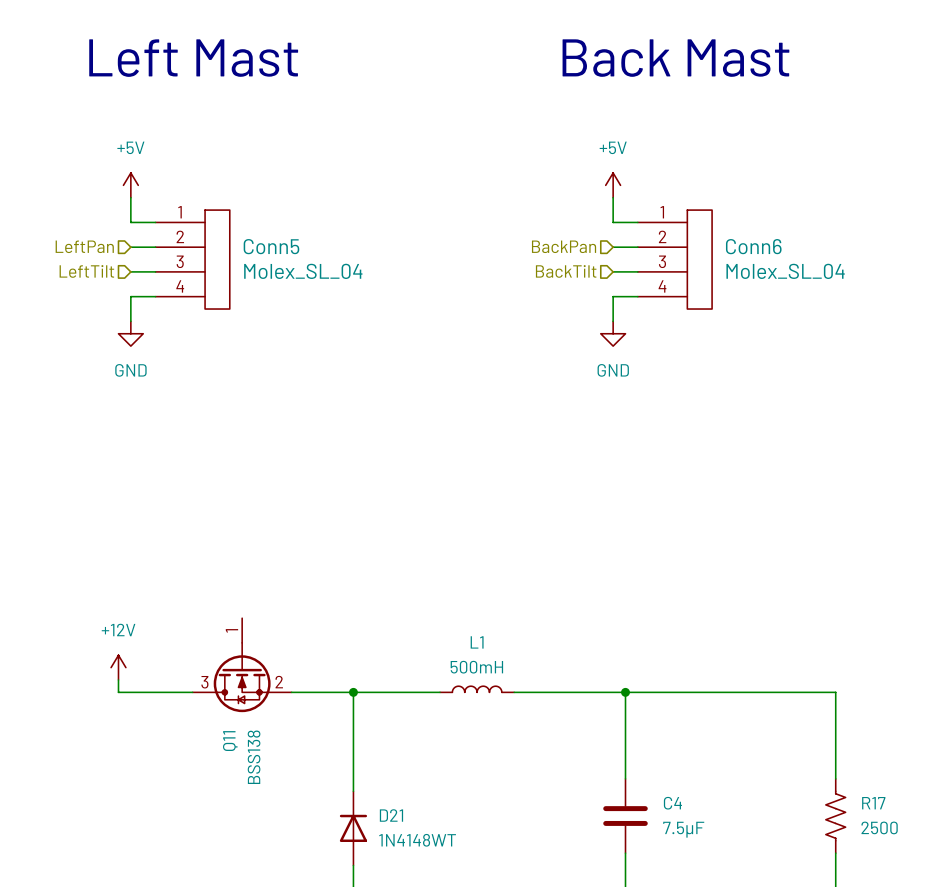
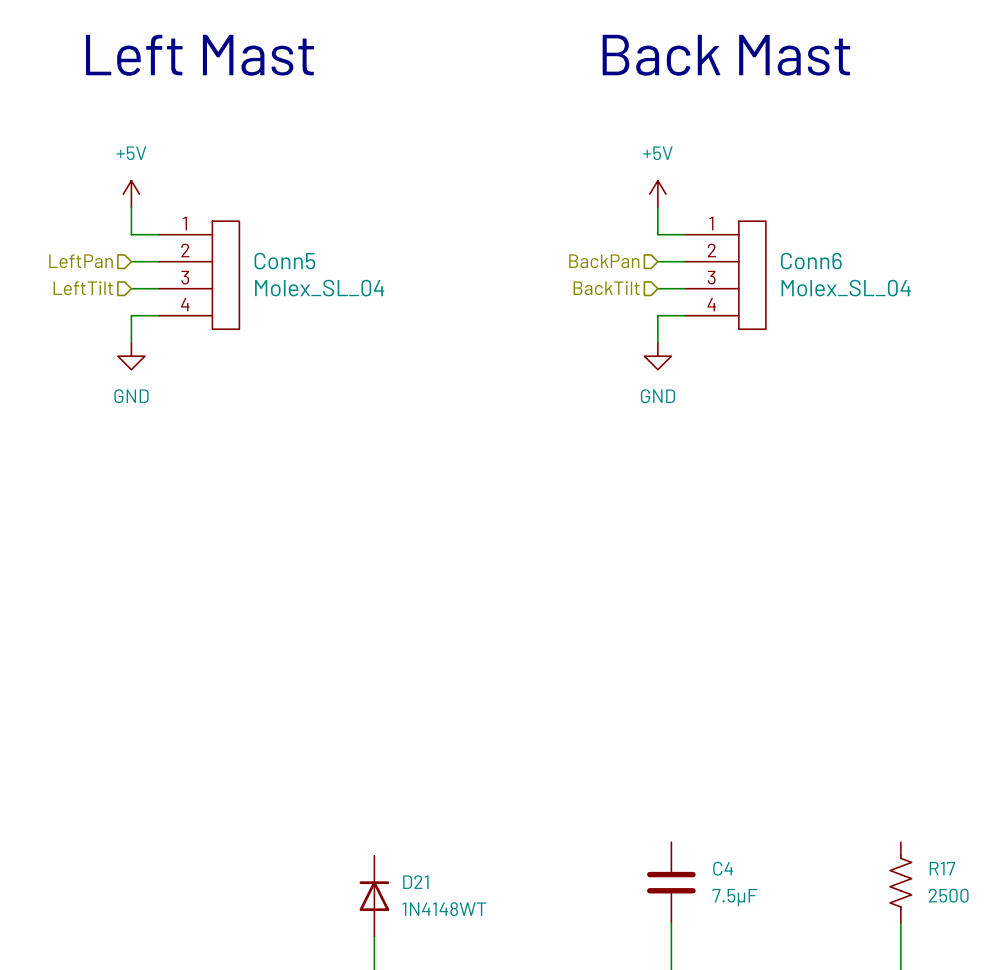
Q11: BSS138 (242, 665) -> none
power symbol: +12V (118, 667) -> none
wire: (118, 680) (118, 692) (192, 692) -> none
L1: 500mH (477, 689) -> none
wire: (291, 692) (440, 692) -> none
wire: (353, 692) (353, 791) -> none
junction: (353, 692) -> none
wire: (514, 692) (835, 692) (835, 778) -> none
wire: (625, 692) (625, 778) -> none
junction: (625, 692) -> none

